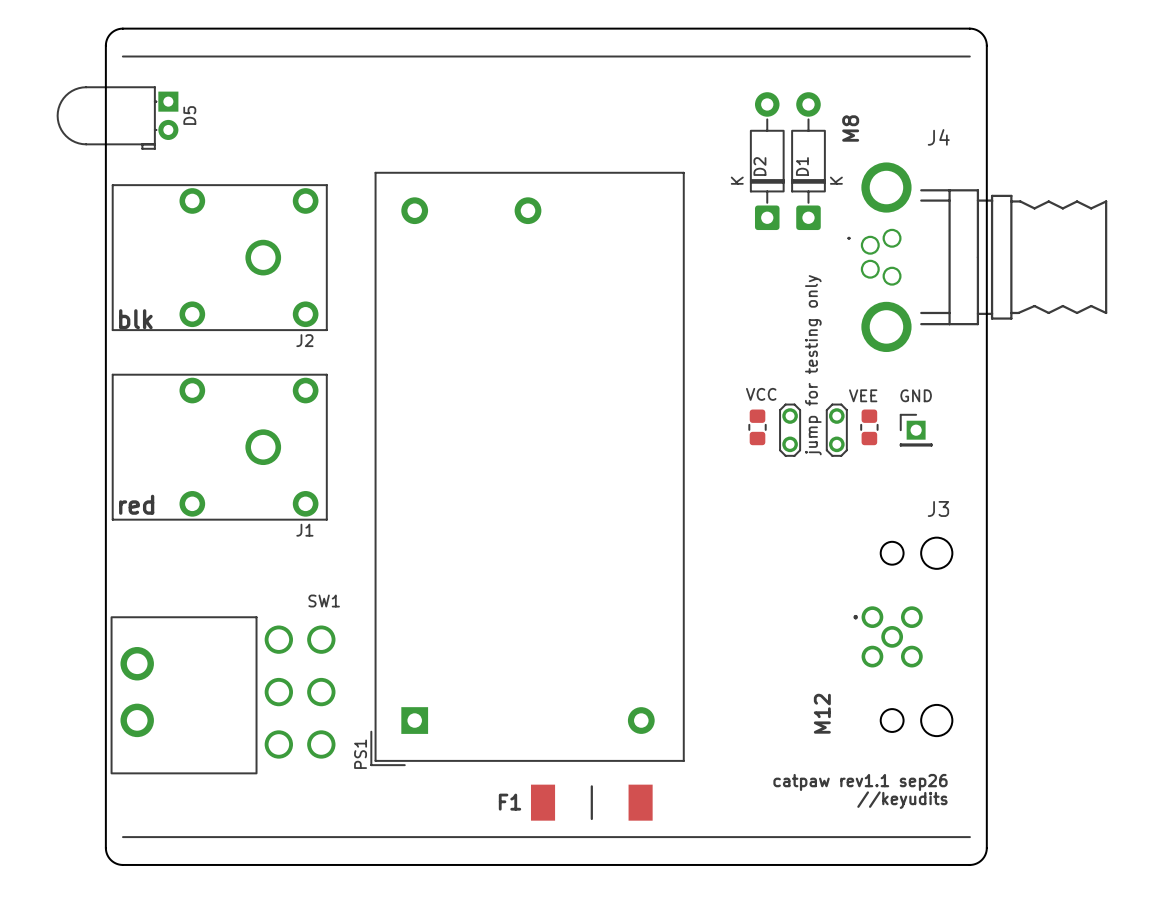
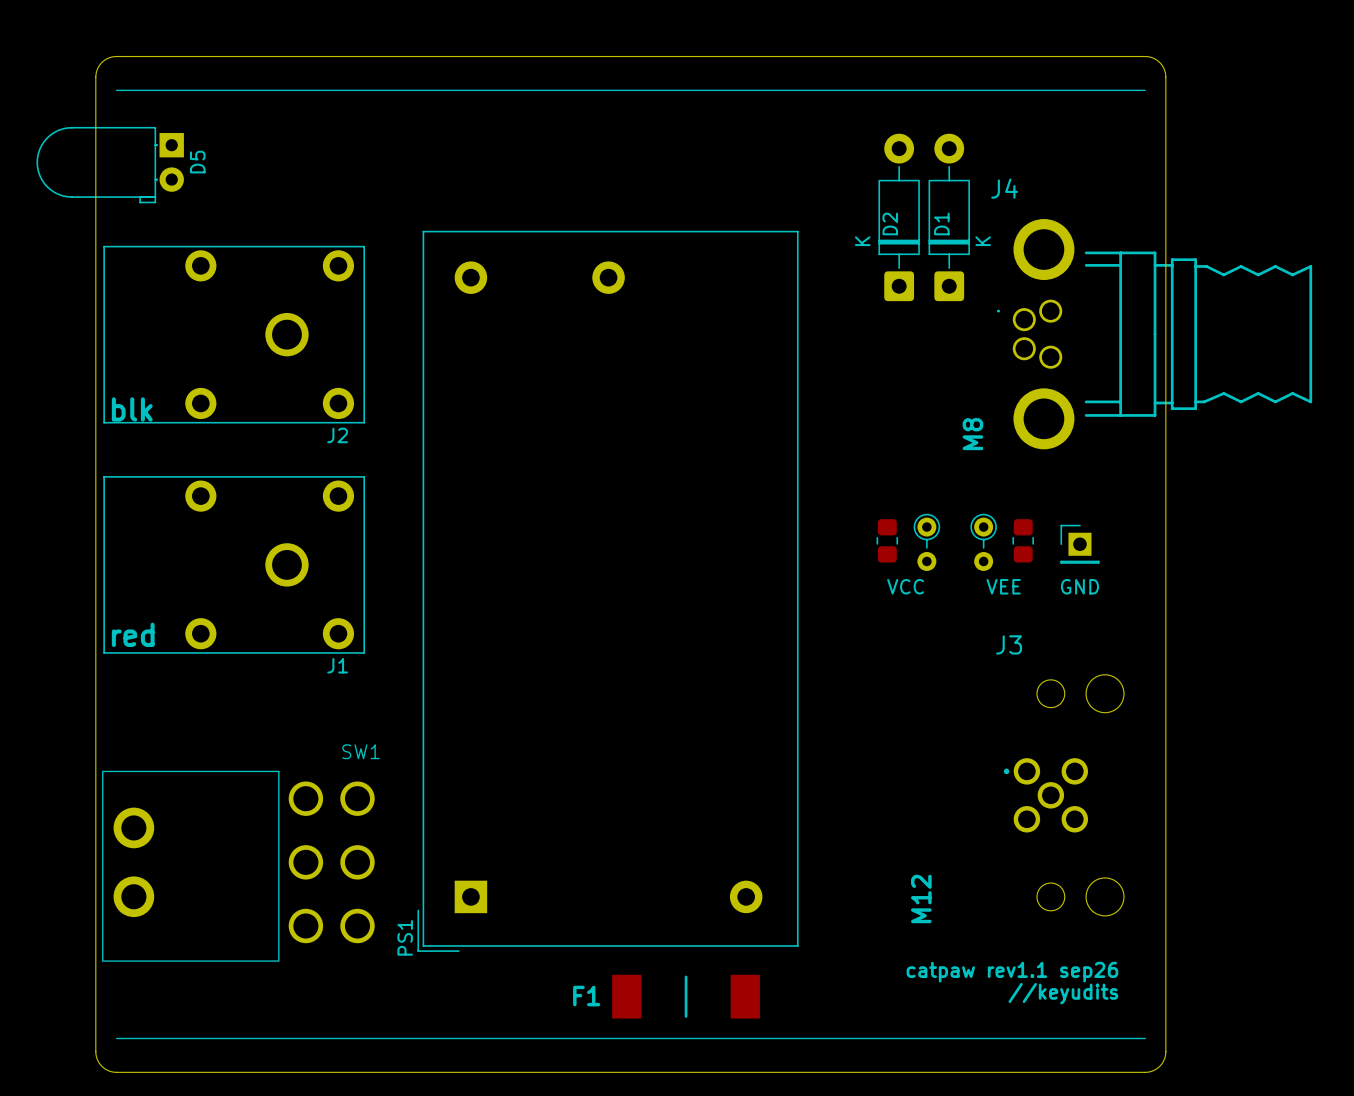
text position: M8 (850, 128) -> M8 (972, 434)
J4 name position: J4 (938, 137) -> J4 (1004, 188)
text: jump for testing only (813, 365) -> none
GND name position: GND (916, 395) -> GND (1079, 586)
part: none -> (926, 542)
part: none -> (983, 542)
VCC: (790, 430) -> none
VEE: (836, 430) -> none
VCC name: none -> VCC (905, 586)
VEE name: none -> VEE (1003, 586)
J3 name position: J3 (938, 508) -> J3 (1009, 644)
text position: M12 (822, 713) -> M12 (921, 898)

